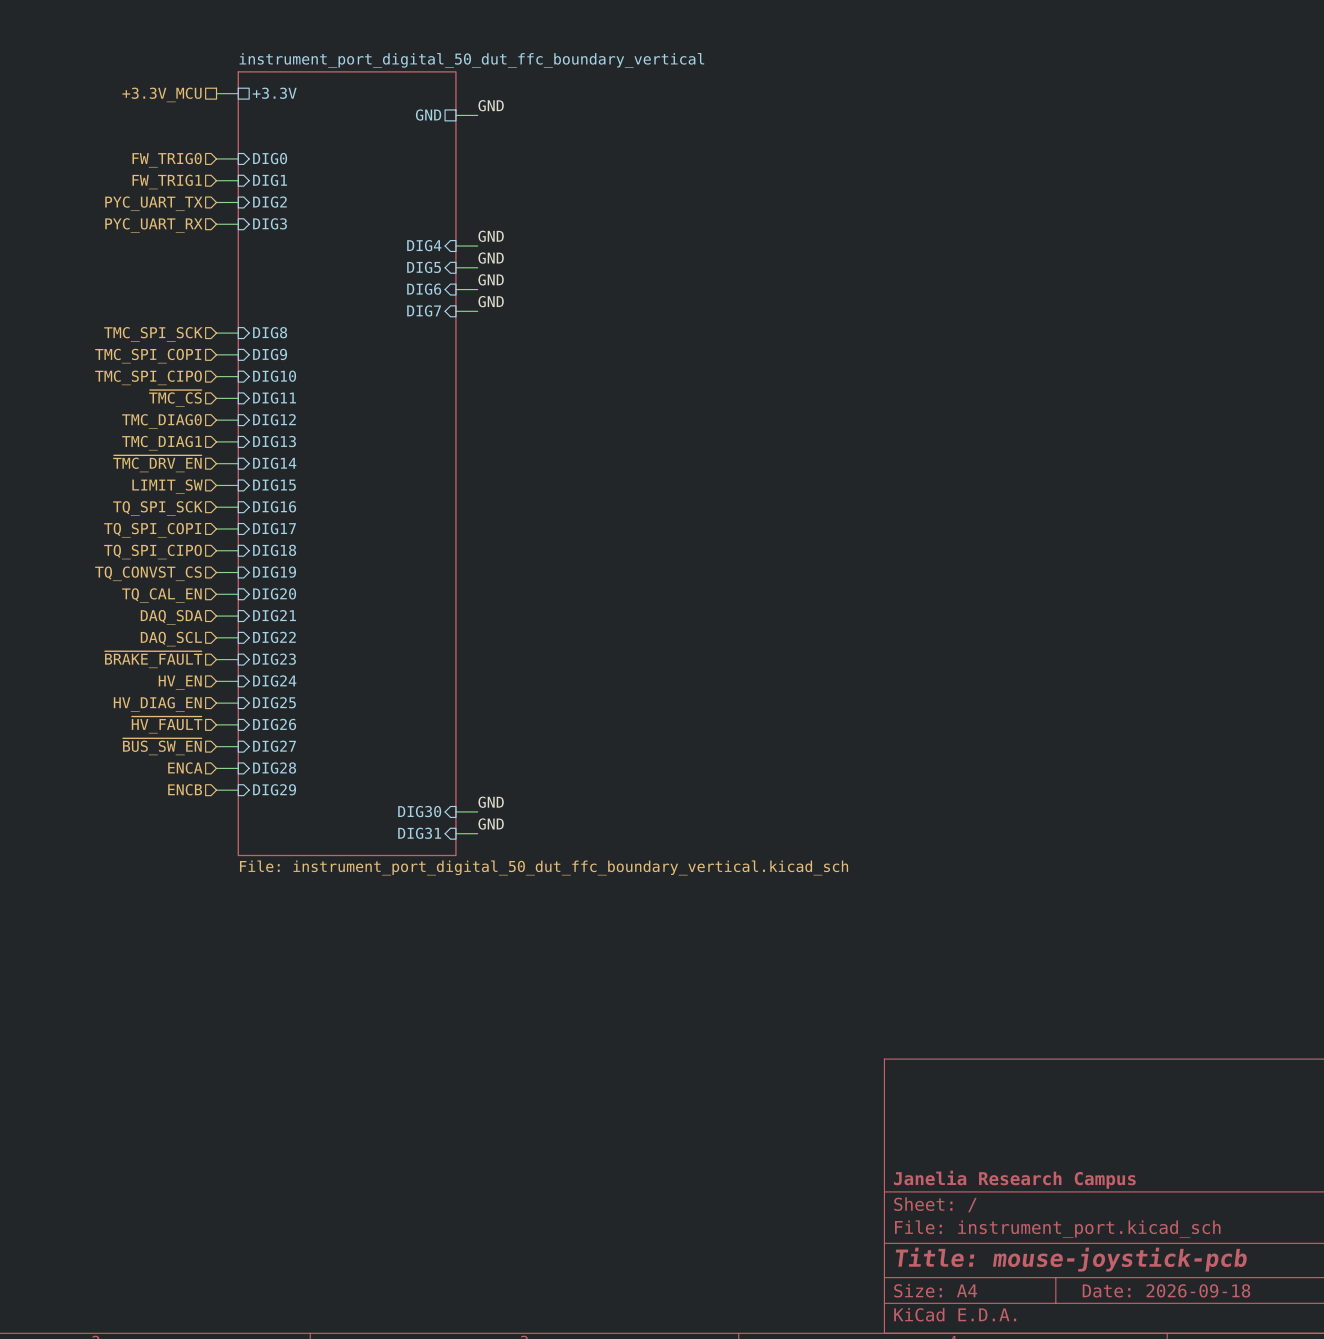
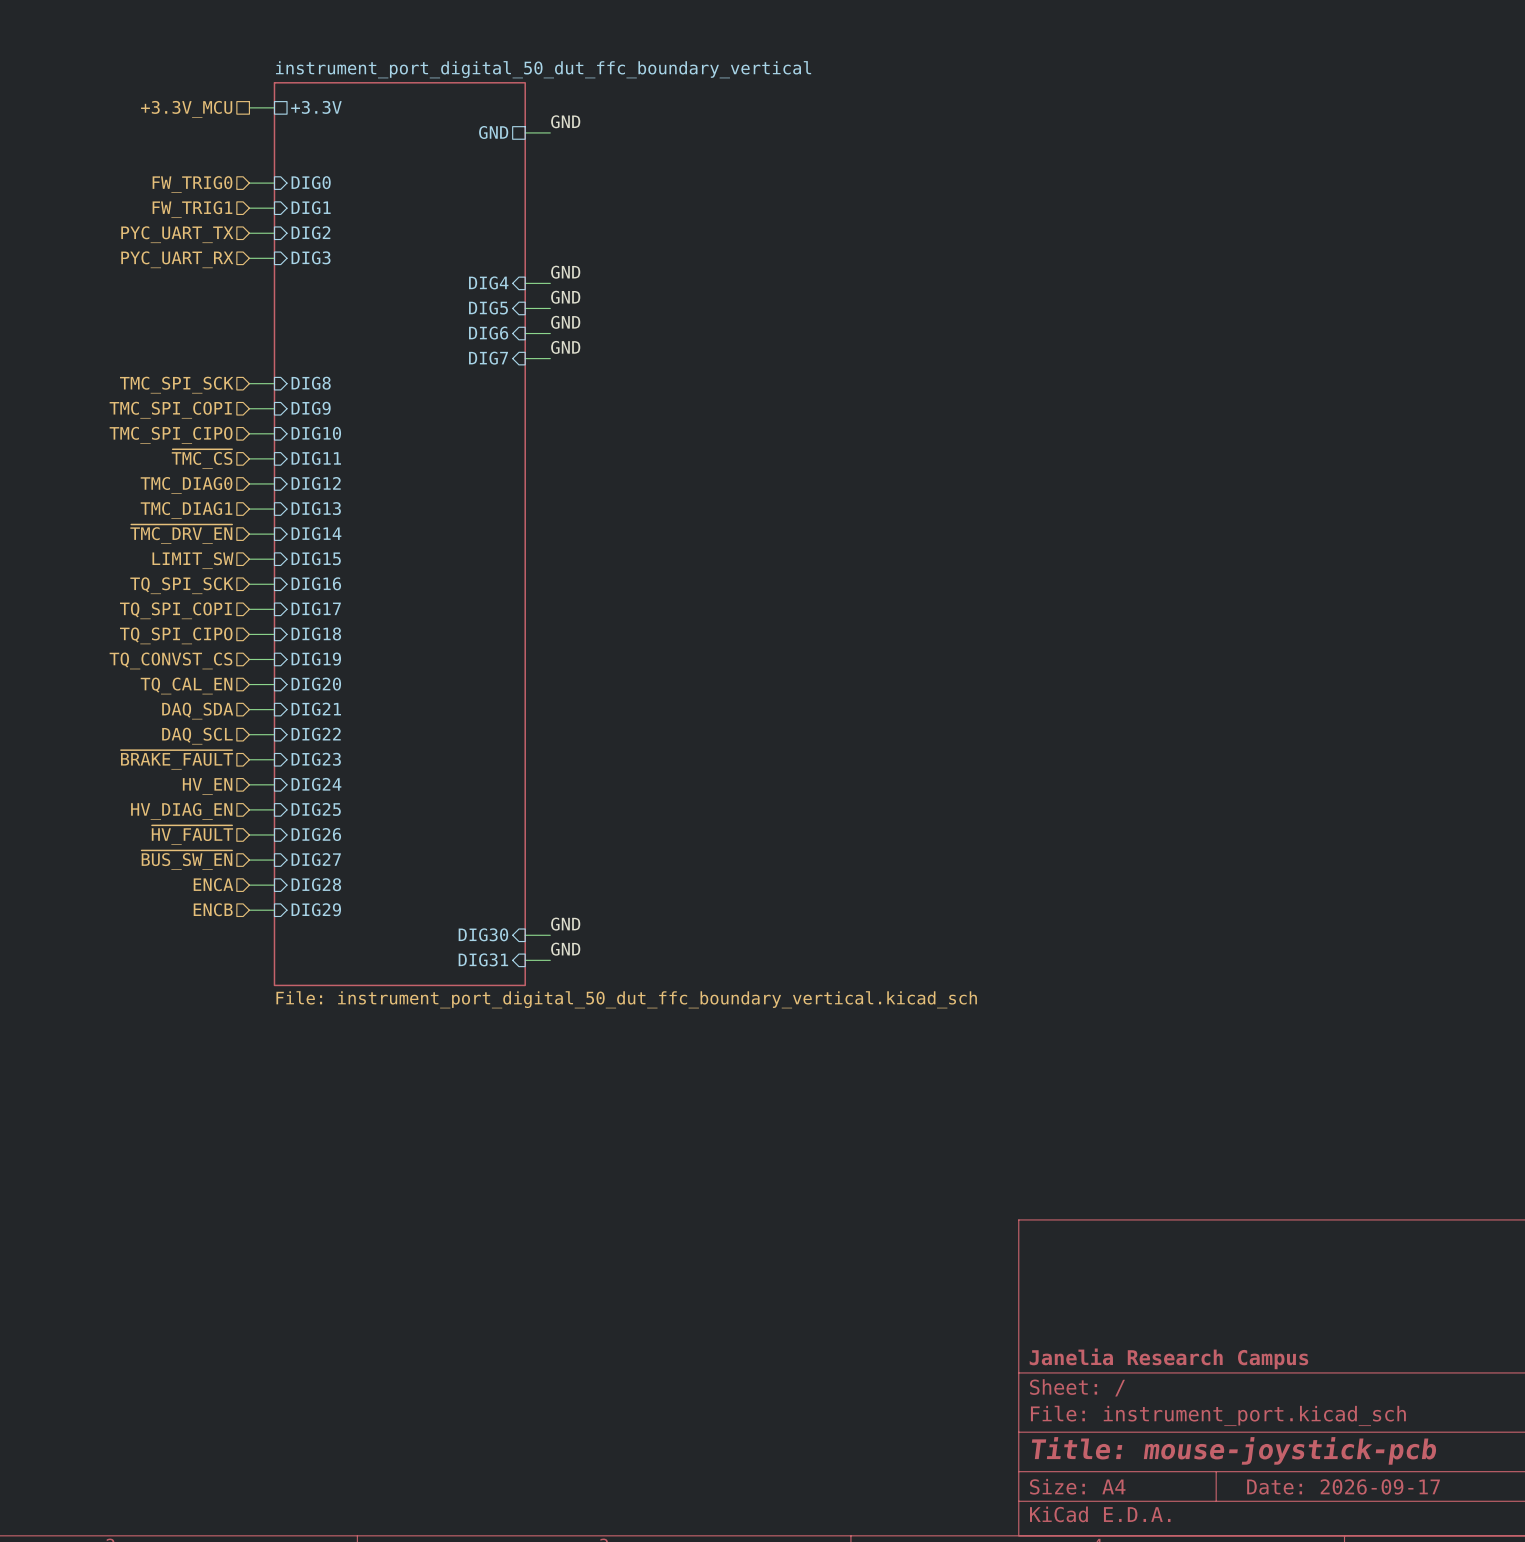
title block: Date: 2026-09-18 (1166, 1290) -> Date: 2026-09-17 (1343, 1486)

